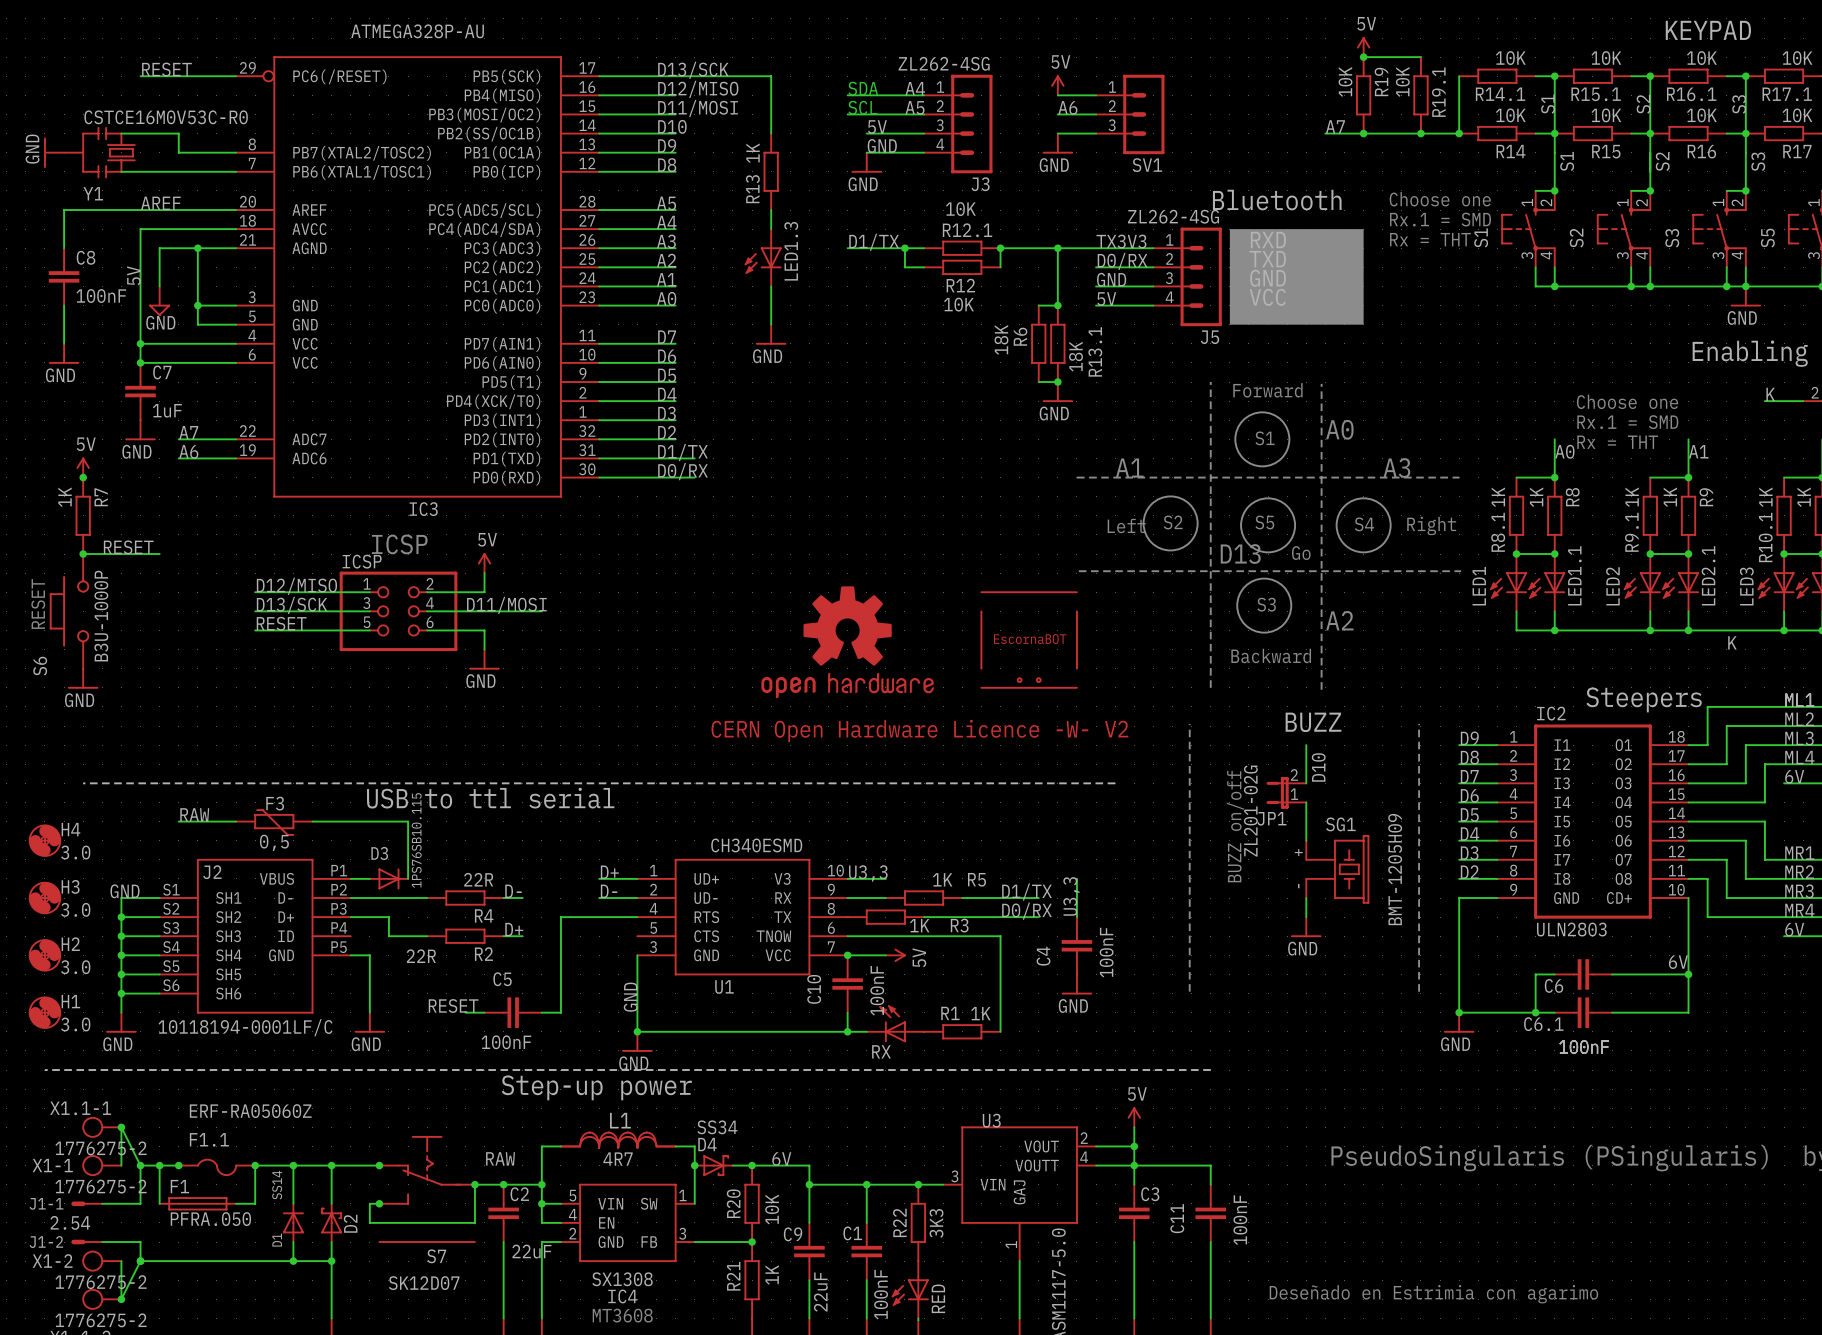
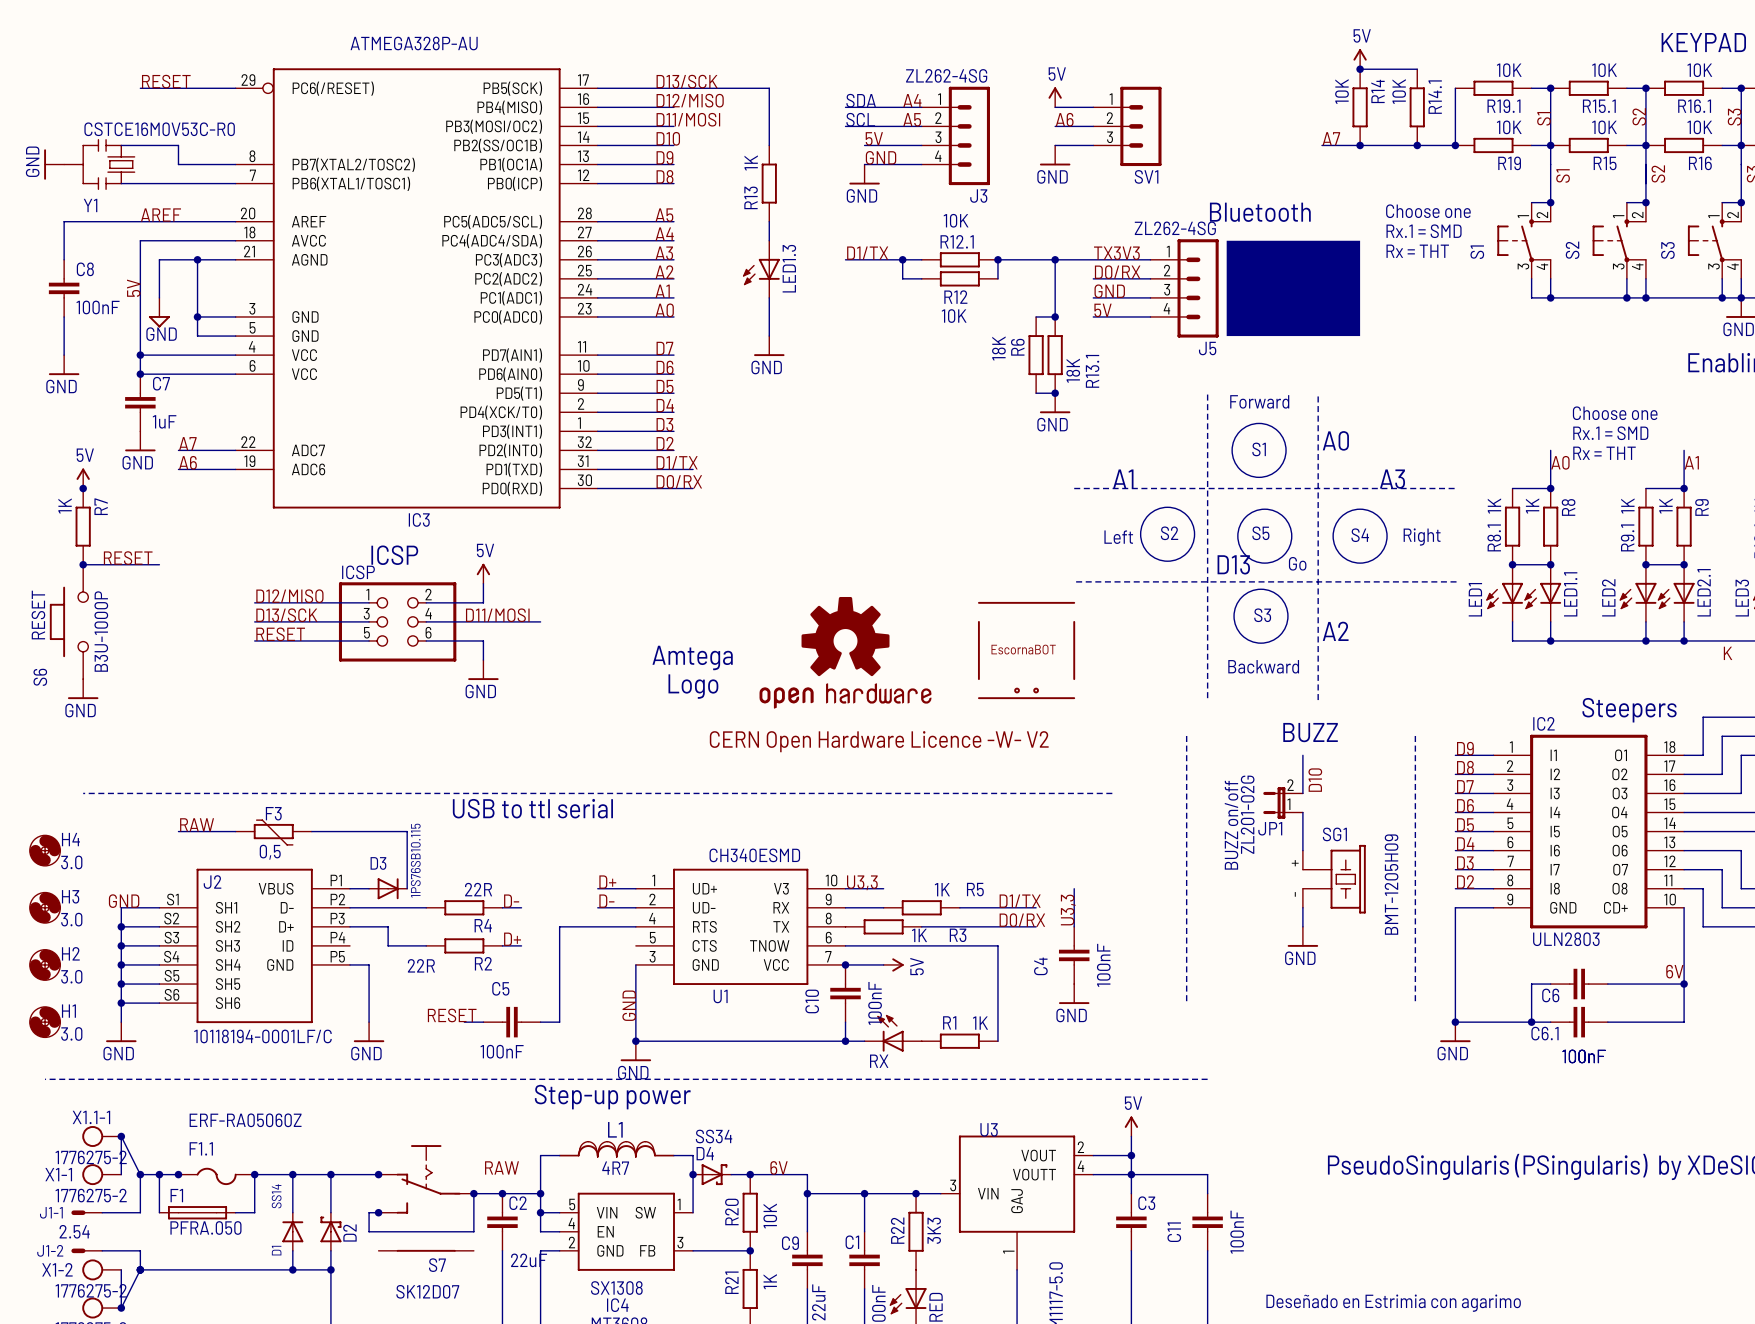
R19 name: R19 (1381, 81) -> R14 (1378, 91)
R19.1 name: R19.1 (1438, 92) -> R14.1 (1435, 97)
R14.1 name: R14.1 (1500, 94) -> R19.1 (1503, 106)
R14 name: R14 (1511, 151) -> R19 (1509, 163)
text: none -> Amtega (692, 657)
text: none -> Logo (693, 686)

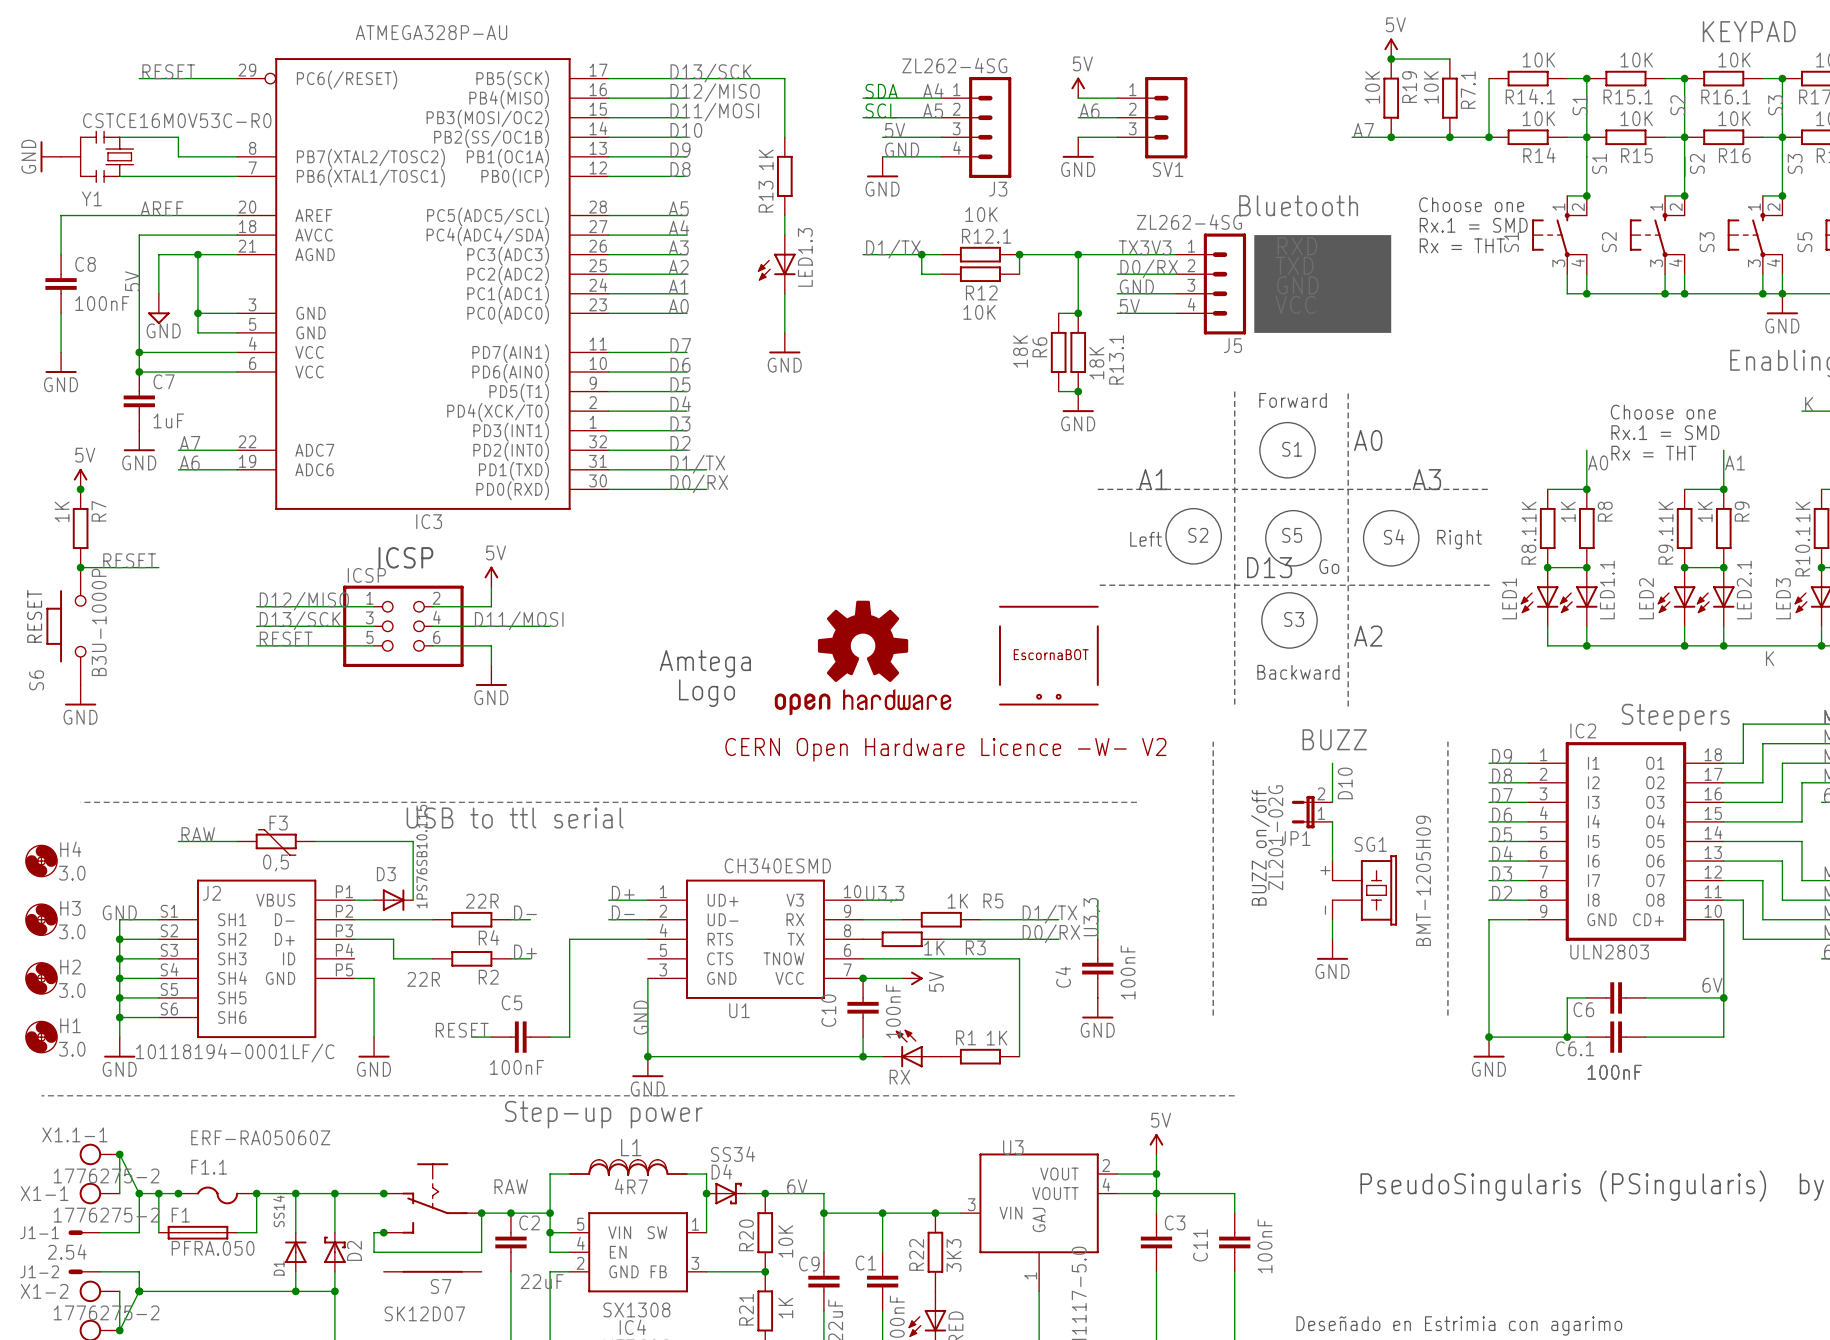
R14 name: R14 (1378, 91) -> R19 (1409, 87)
R14.1 name: R14.1 (1435, 97) -> R7.1 (1468, 90)
R19.1 name: R19.1 (1503, 106) -> R14.1 (1530, 96)
R19 name: R19 (1509, 163) -> R14 (1539, 155)

